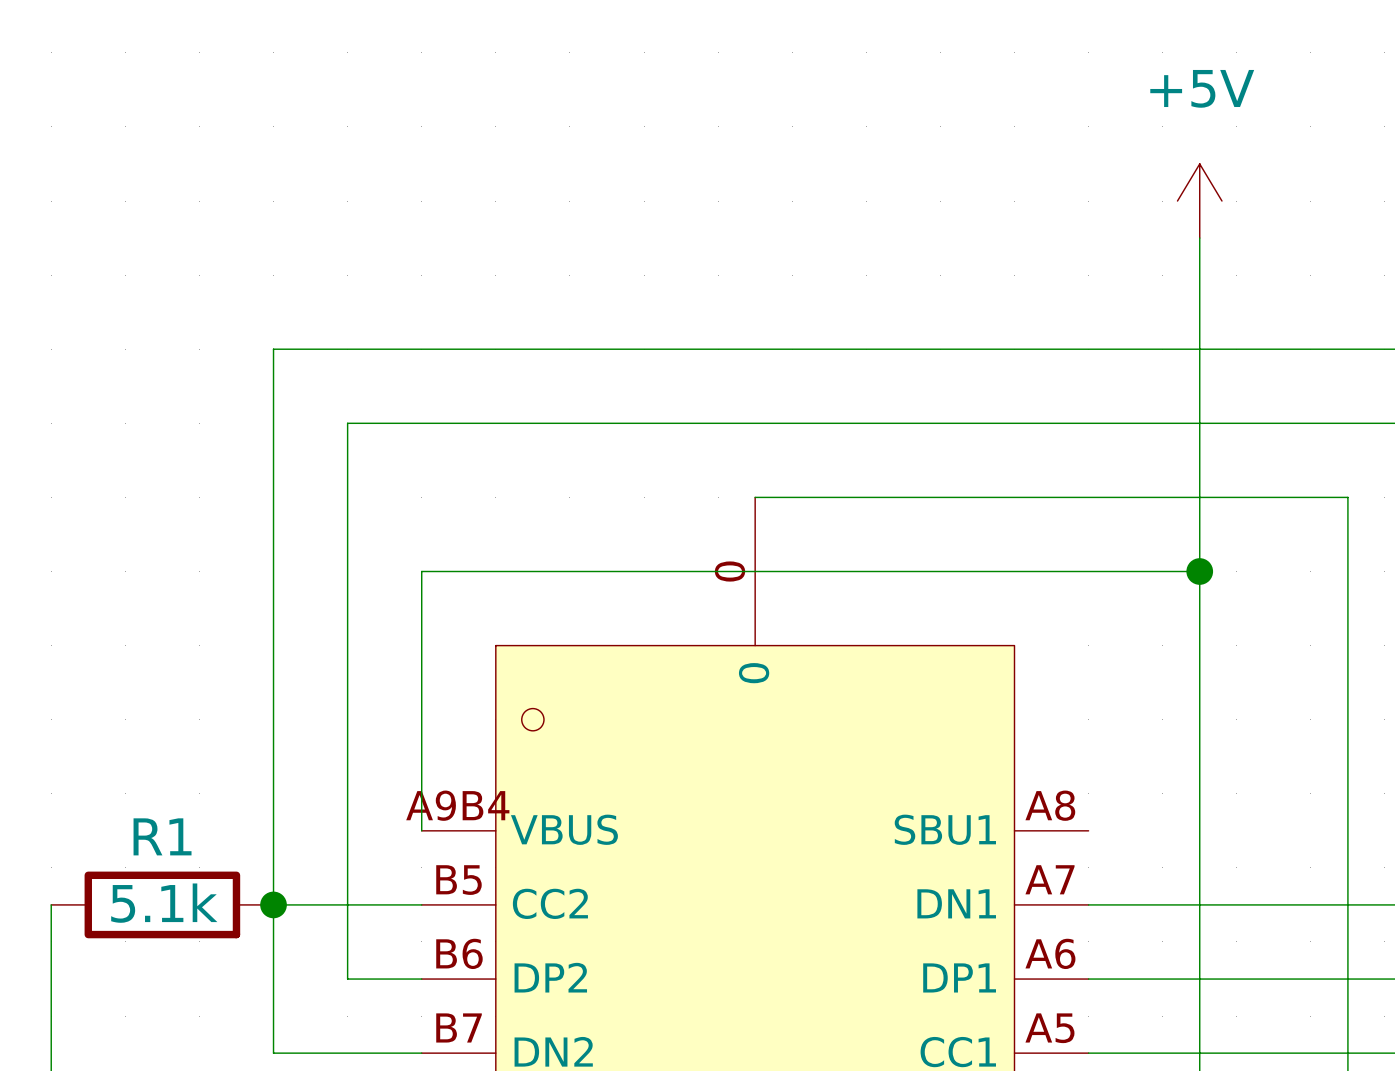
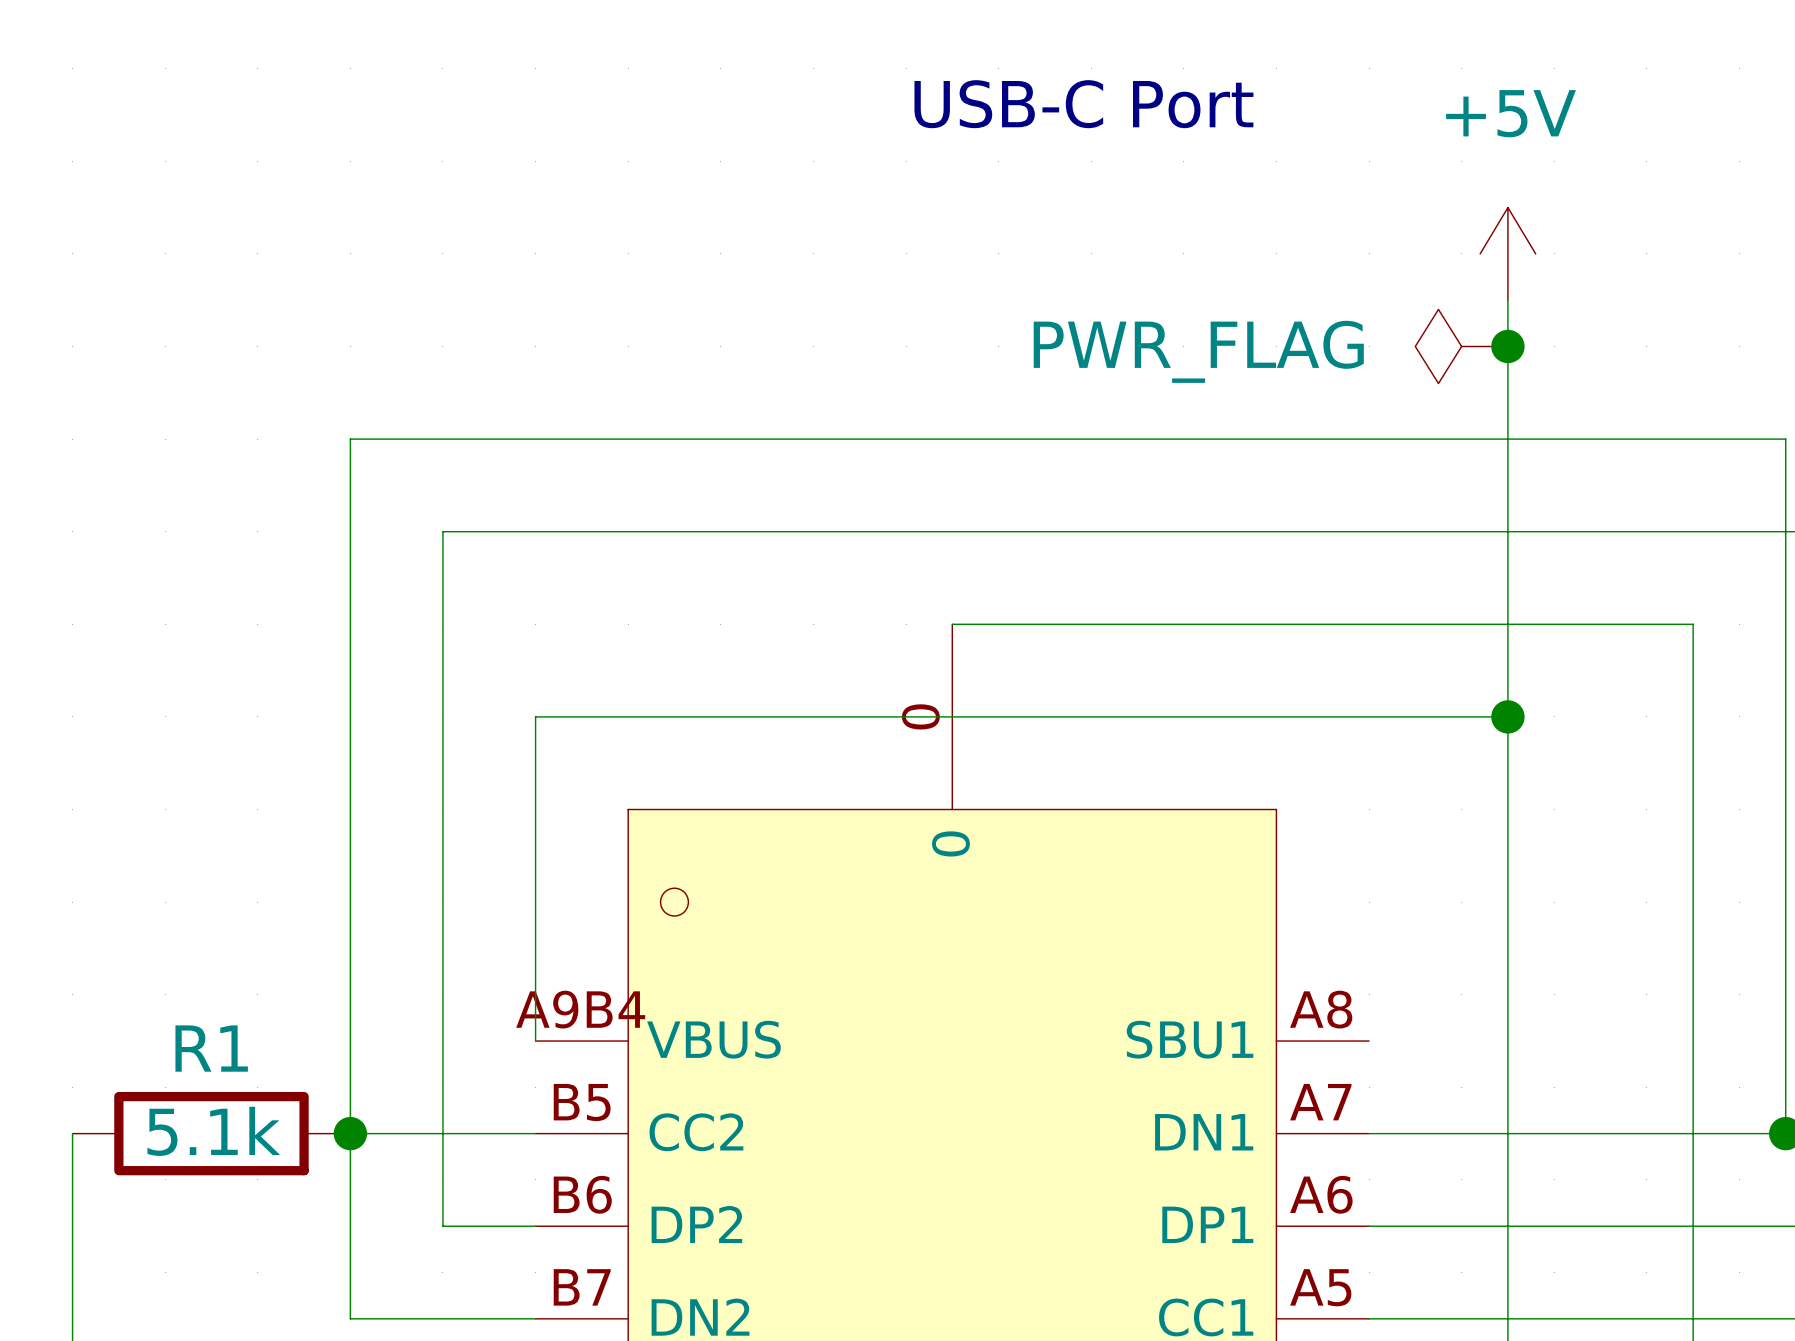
text: none -> USB-C Port (1083, 104)
power symbol: none -> PWR_FLAG (1461, 346)
junction: none -> (1507, 346)

